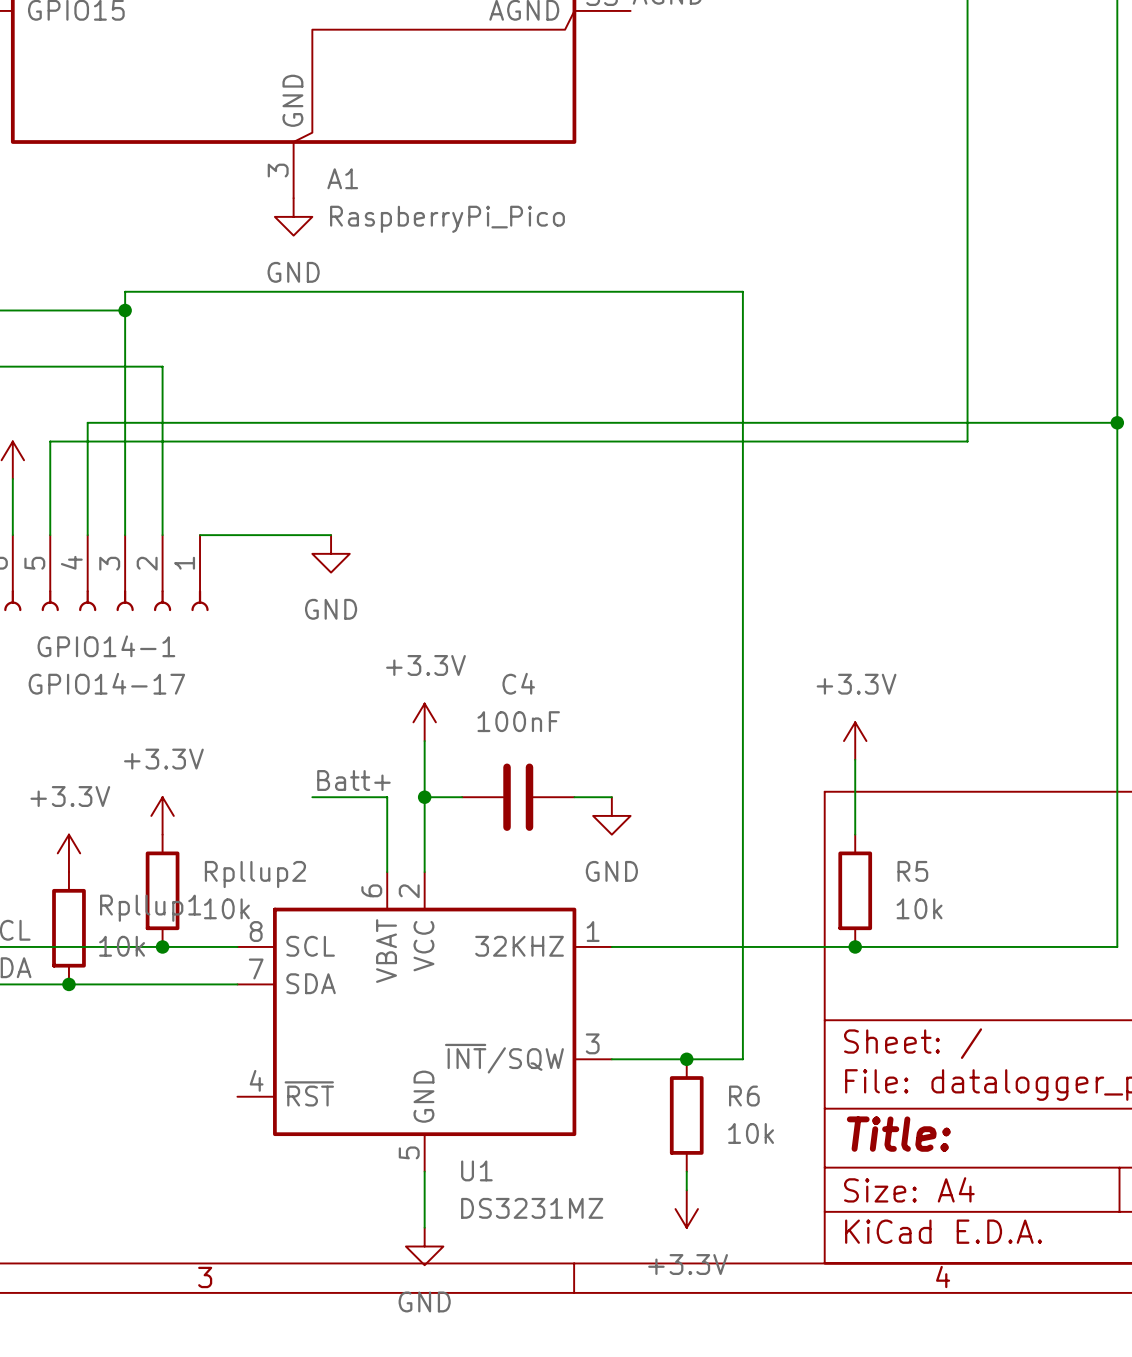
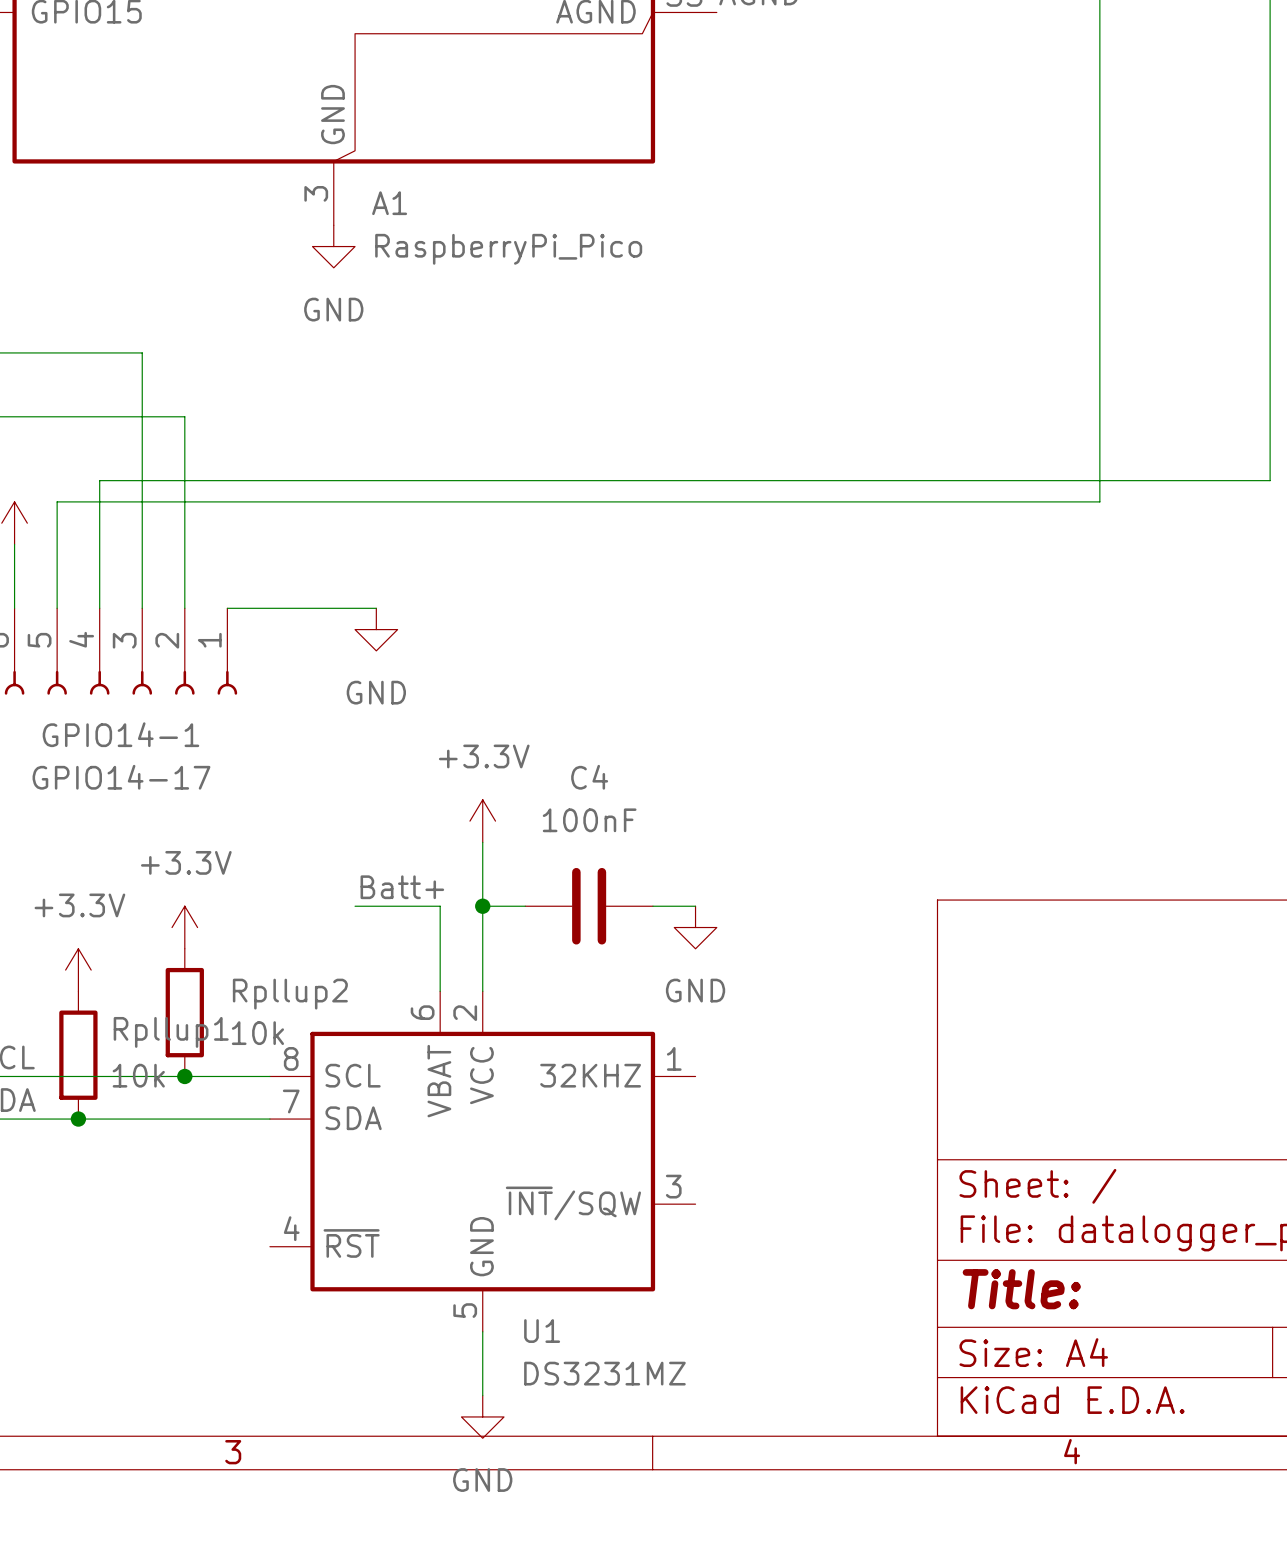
wire: (125, 310) (125, 291) (742, 291) (742, 1059) (611, 1059) -> none
junction: (125, 310) -> none
wire: (1117, 422) (1117, 946) (611, 946) -> none
junction: (1117, 422) -> none
power symbol: +3.3V (855, 741) -> none
wire: (855, 759) (855, 834) -> none
R5: 10k (855, 890) -> none
junction: (855, 946) -> none
junction: (686, 1059) -> none
R6: 10k (686, 1115) -> none
wire: (686, 1171) (686, 1190) -> none
power symbol: +3.3V (686, 1209) -> none

